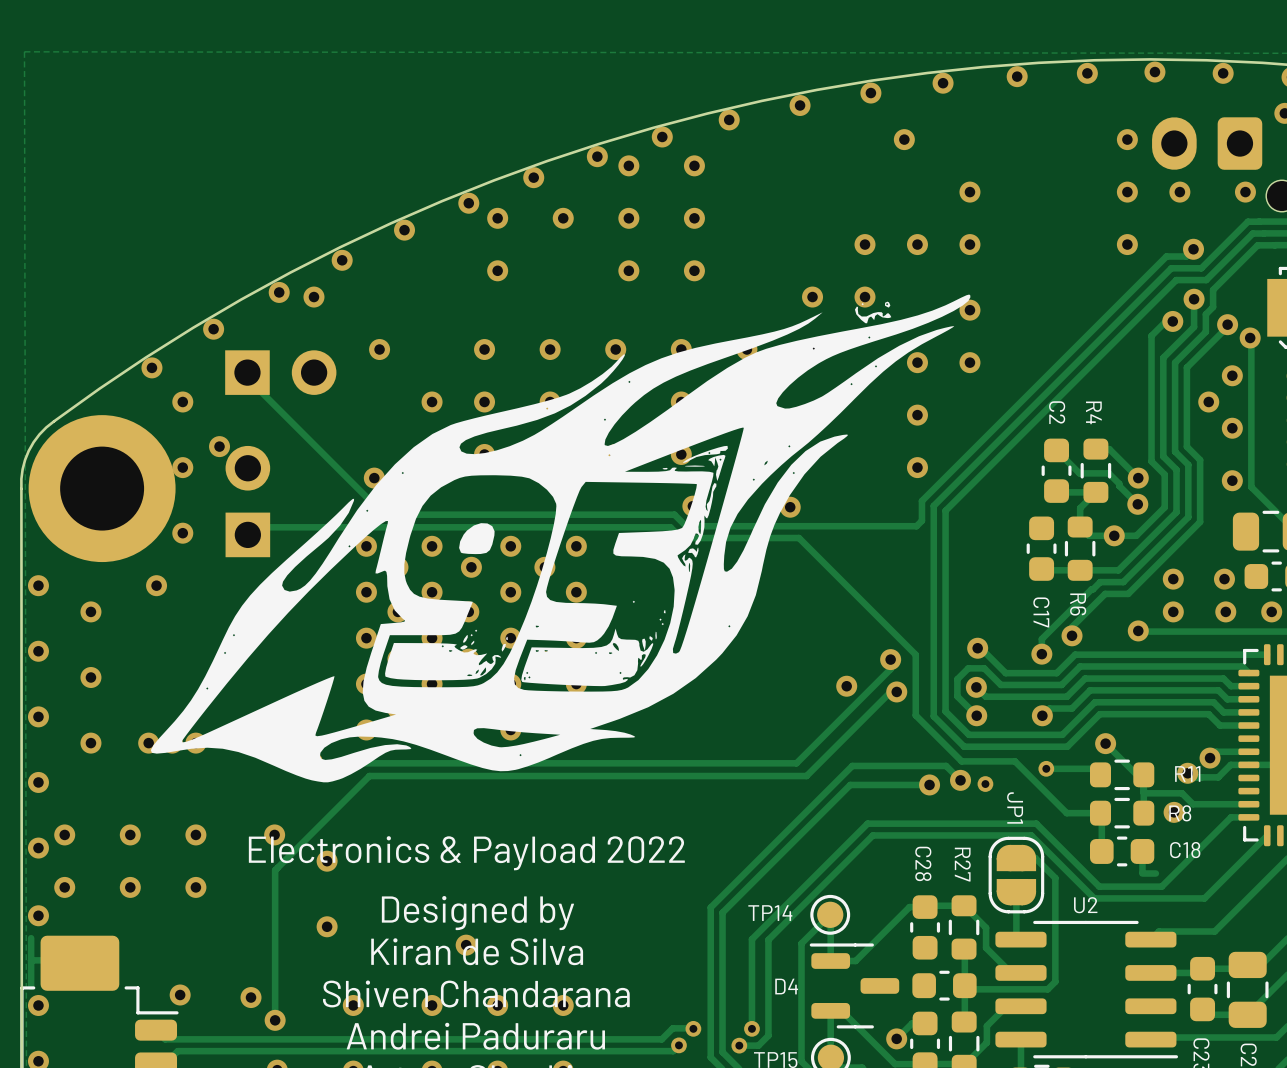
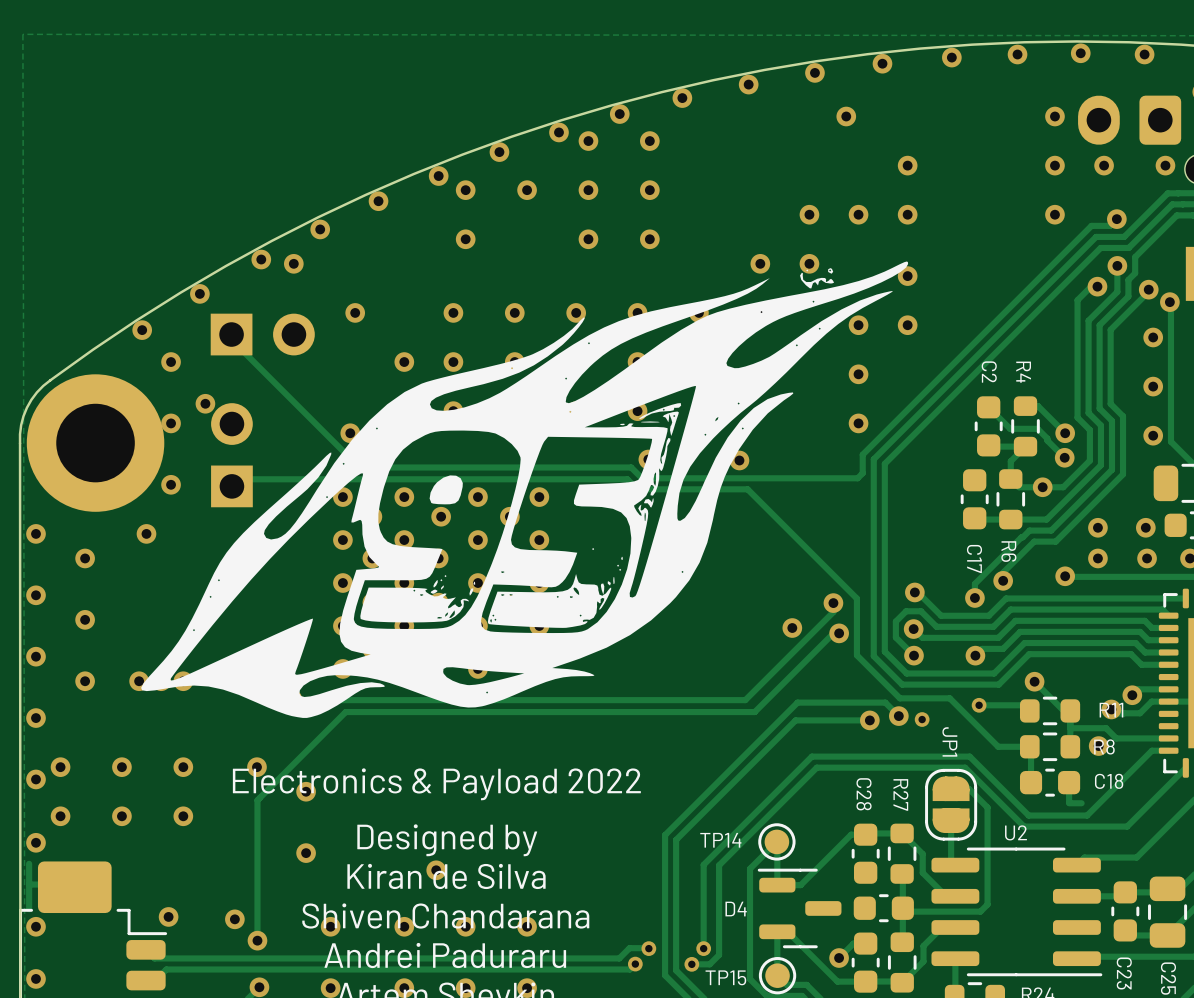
via: (1208, 401) -> none

